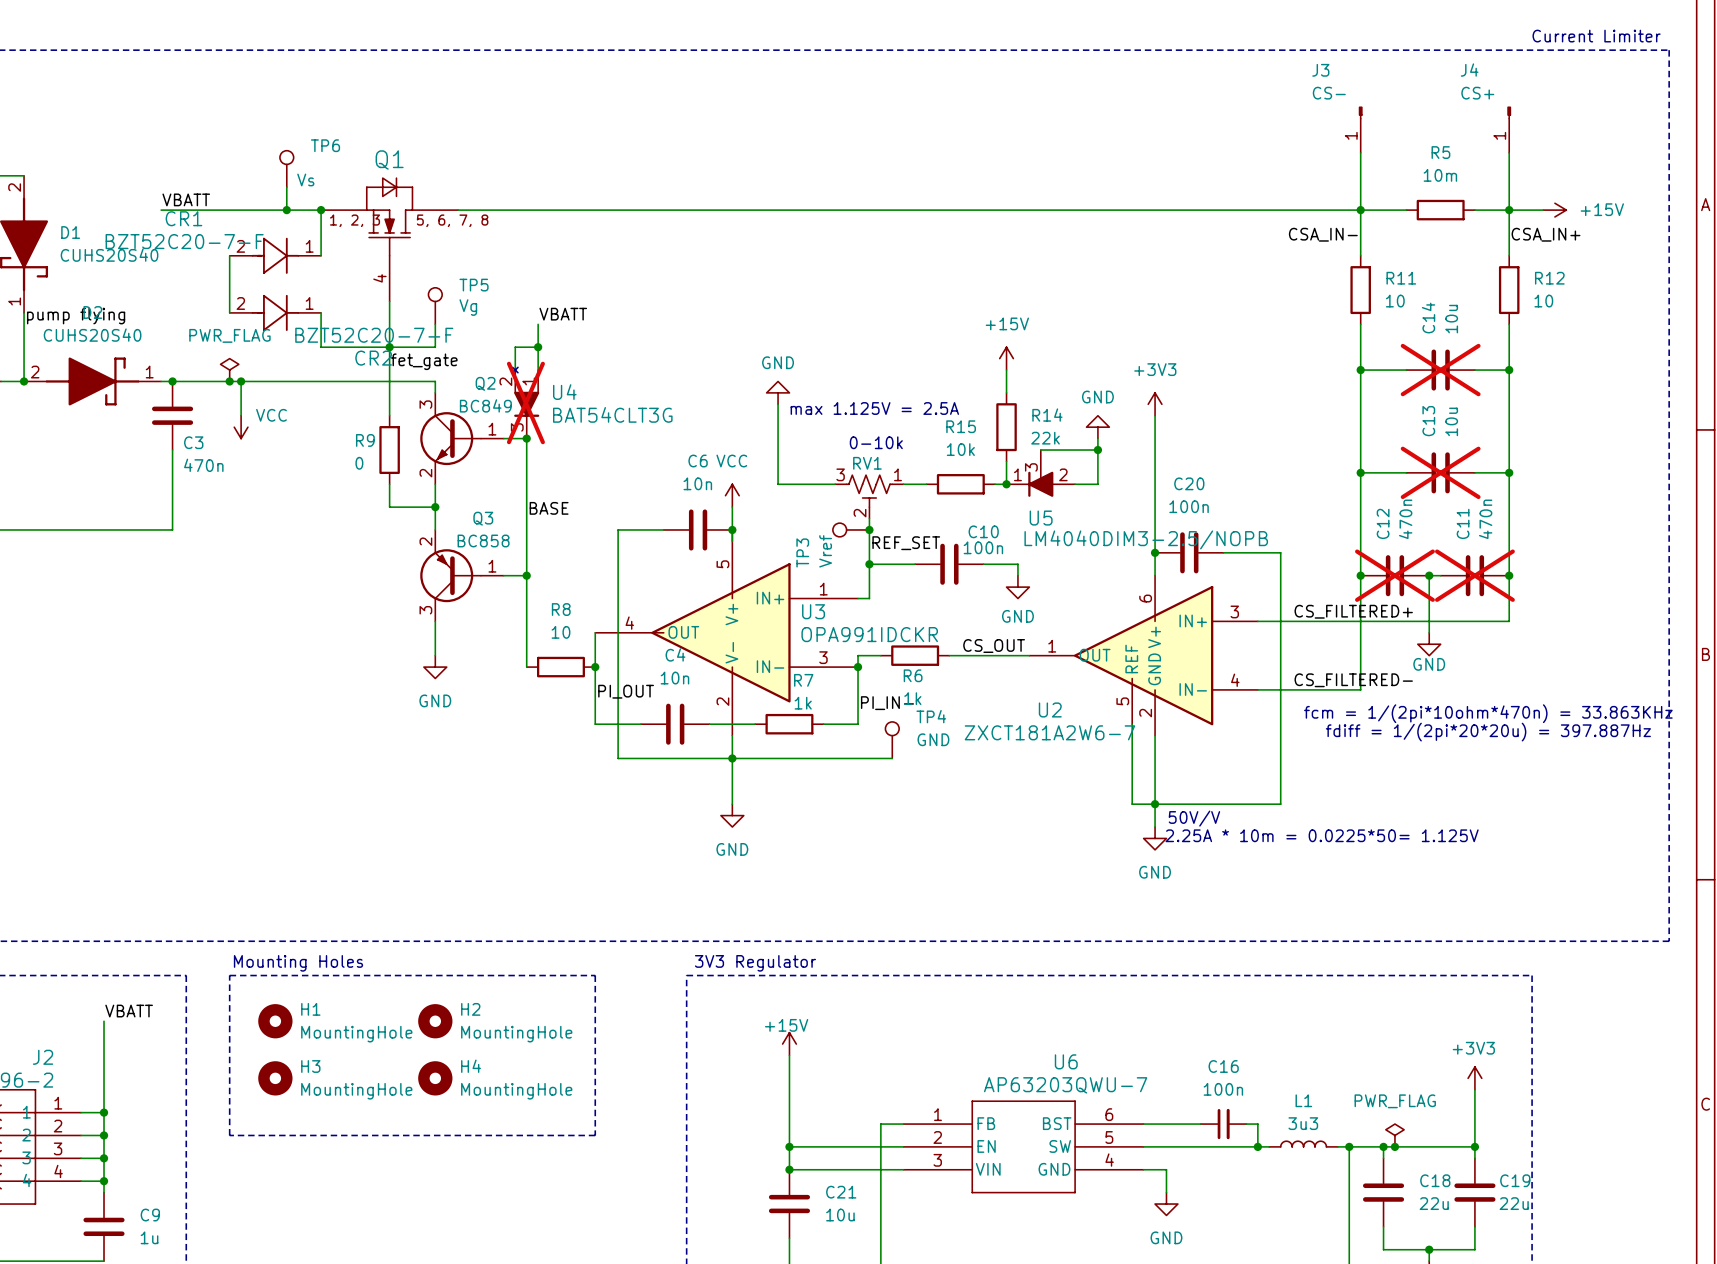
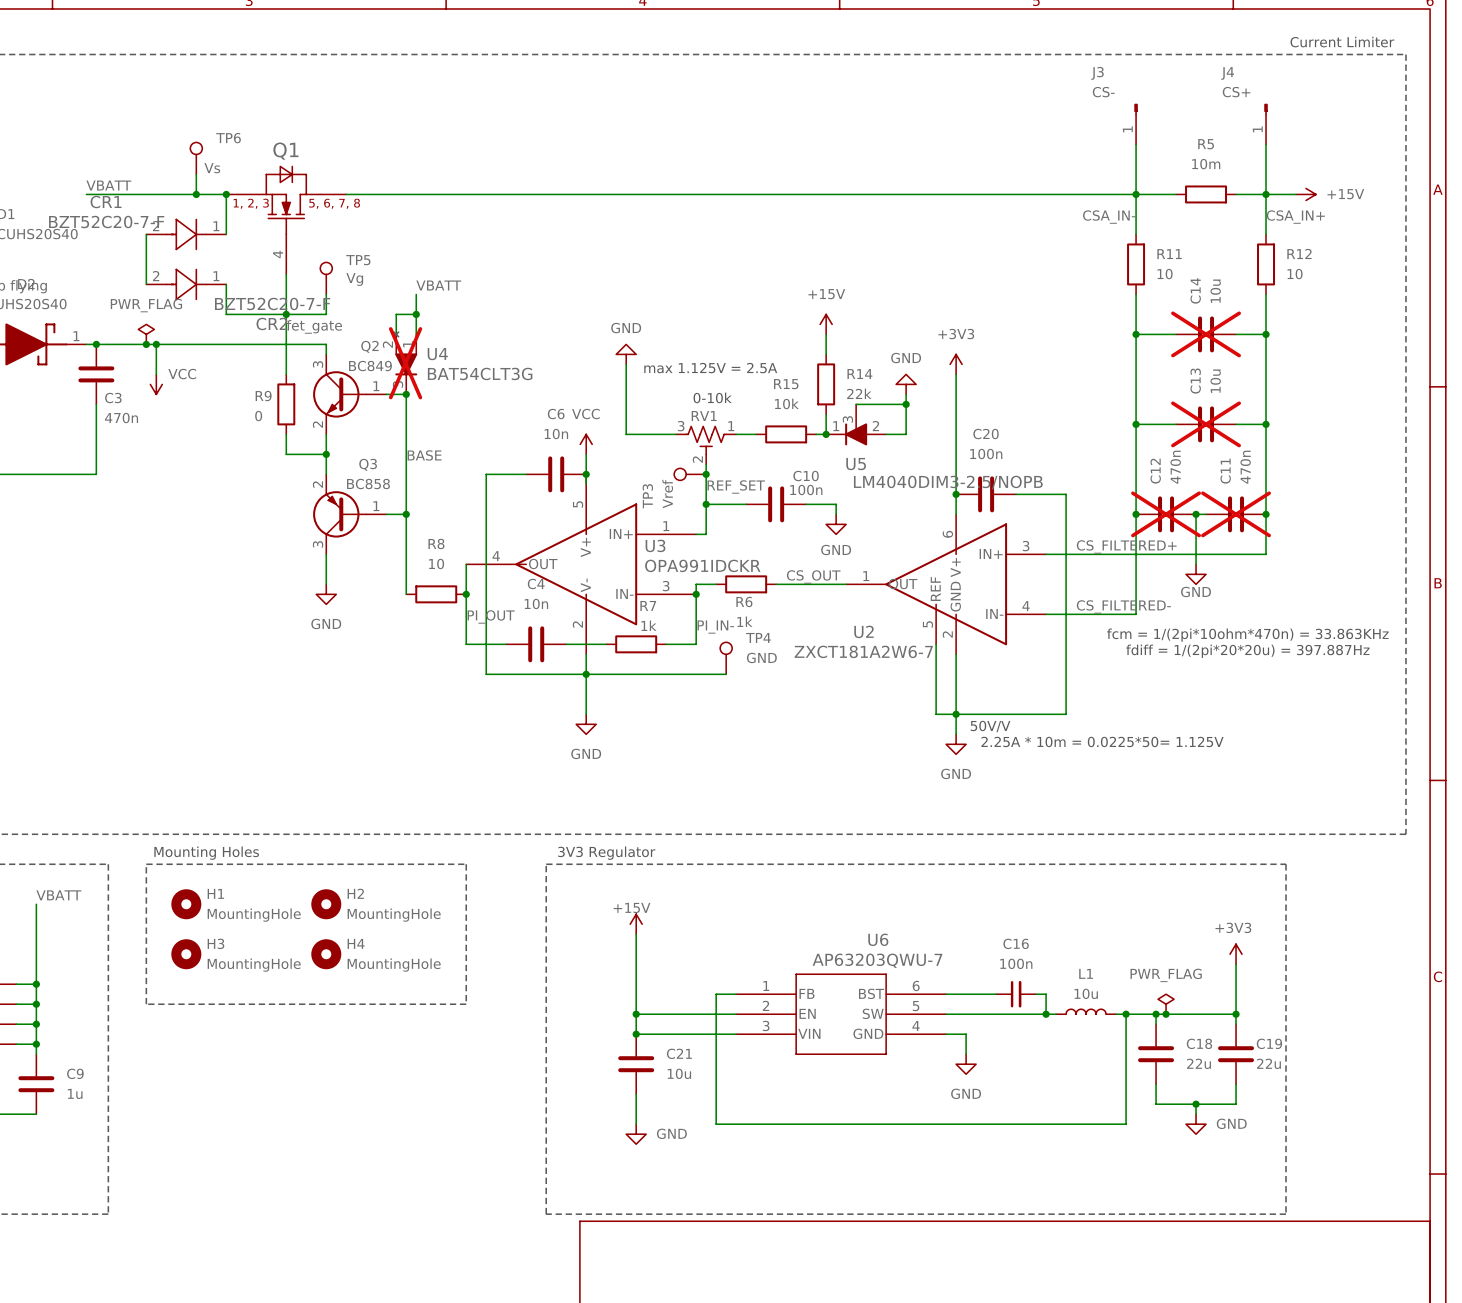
L1 value: 3u3 (1303, 1123) -> 10u (1086, 993)

